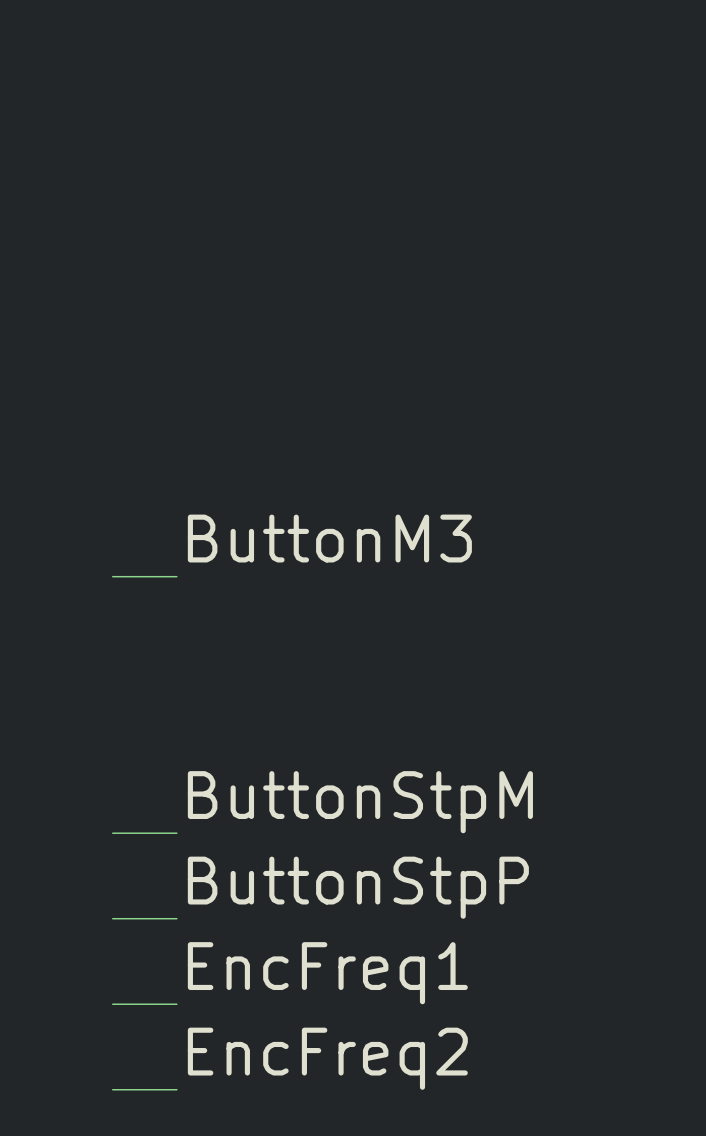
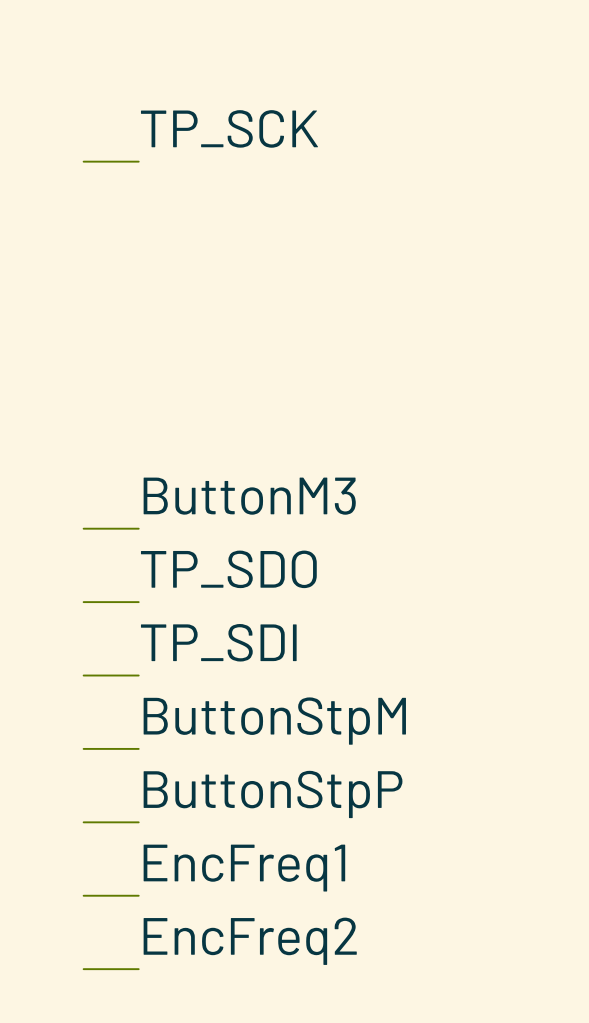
label: none -> TP_SCK (229, 128)
wire: none -> (83, 161) (138, 161)
label: none -> TP_SDO (228, 569)
wire: none -> (83, 602) (138, 602)
label: none -> TP_SDI (218, 642)
wire: none -> (83, 675) (138, 675)

